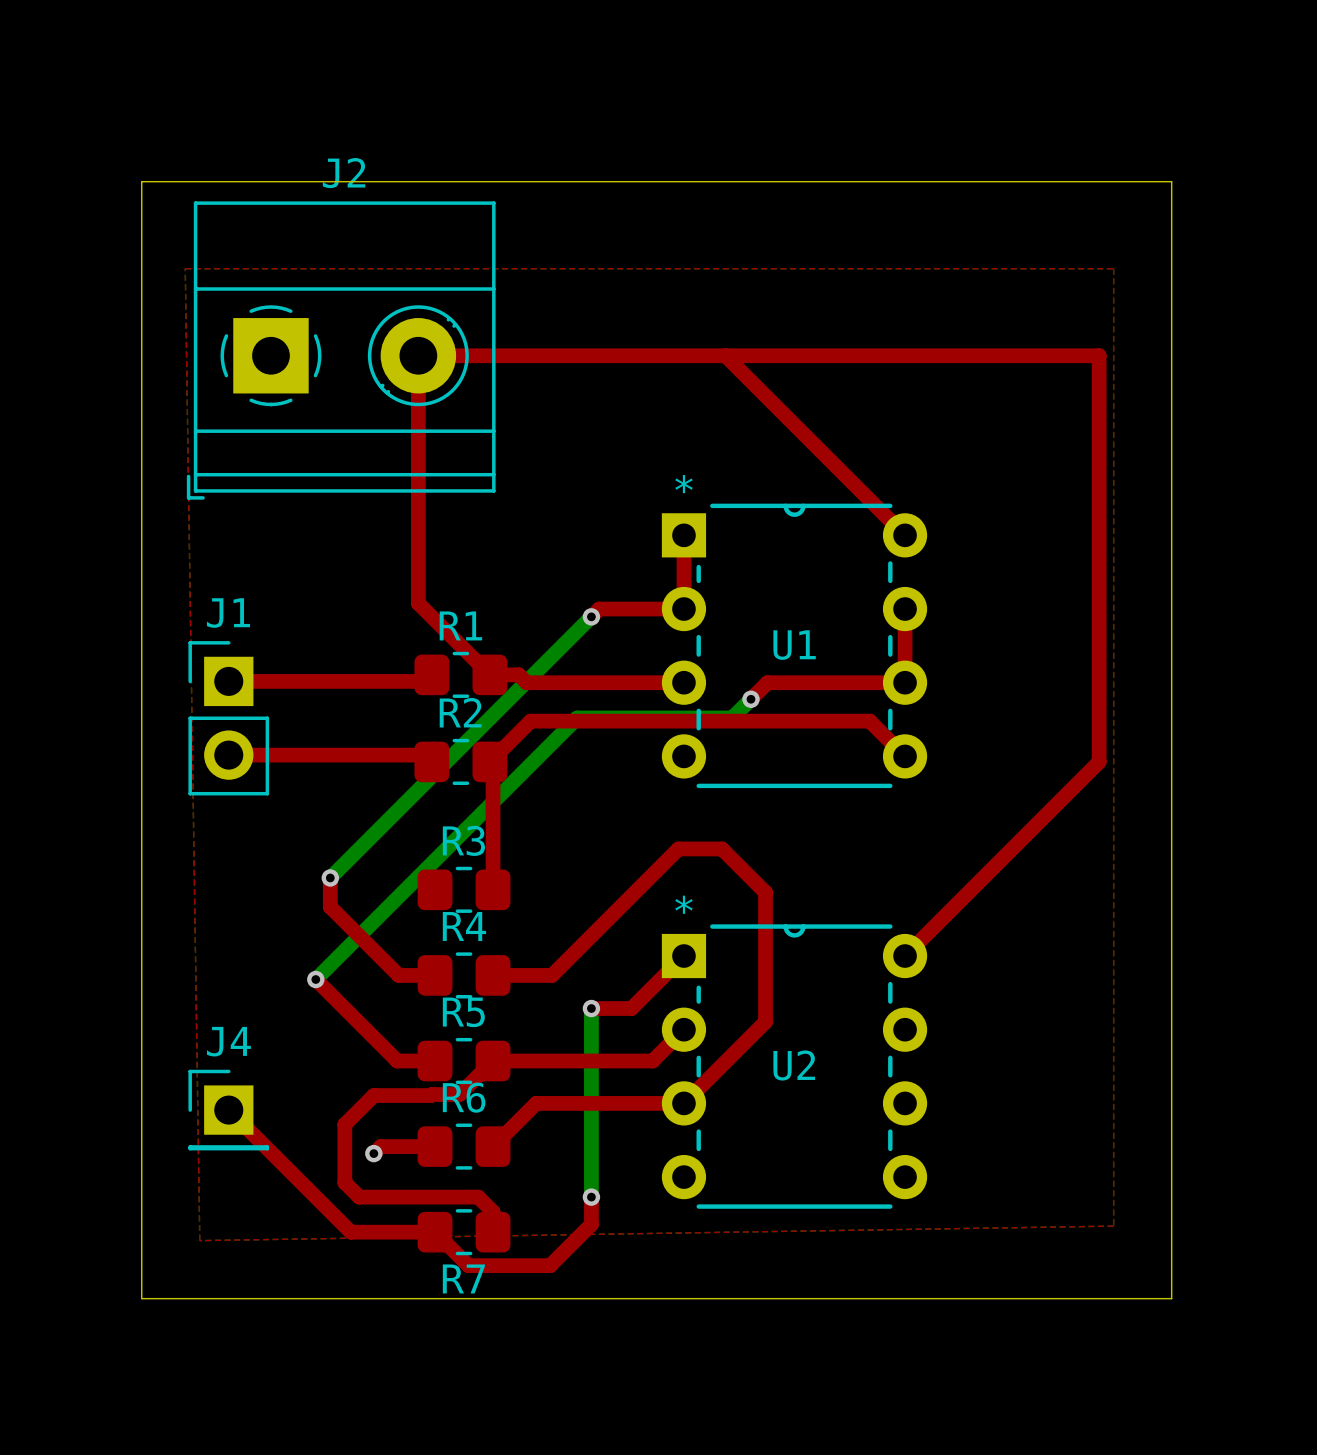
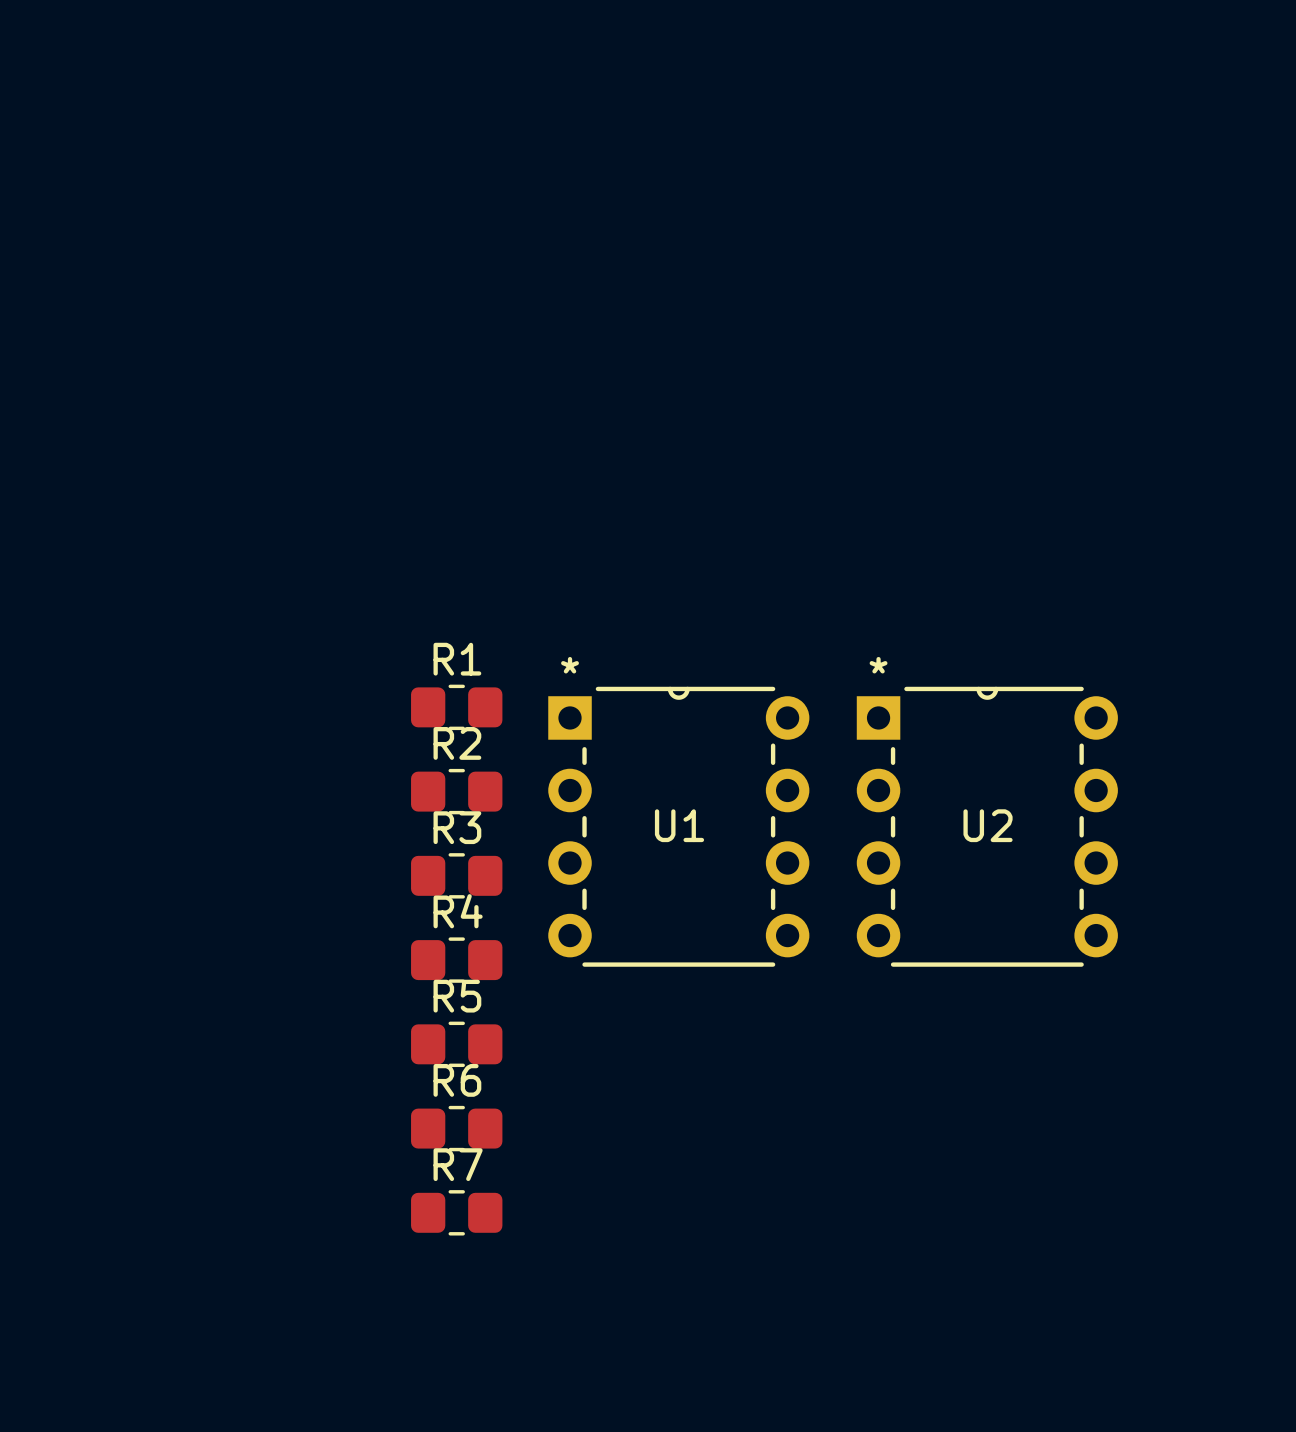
board edge: (141, 181) (1171, 181) (1171, 1298) (141, 1298) (141, 181) -> none
top zone outline: (185, 268) (1113, 268) (1113, 1226) (199, 1240) (185, 268) -> none
J2: (341, 350) -> none
top track: (725, 355) (905, 535) -> none
top track: (683, 535) (683, 609) (599, 609) (591, 616) -> none
top track: (905, 609) (905, 682) (767, 682) (750, 699) -> none
bottom track: (591, 616) (330, 877) -> none
via: (591, 616) -> none
U1 position: (794, 645) -> (678, 826)
top track: (431, 674) (425, 681) (228, 681) -> none
R1 position: (460, 674) -> (456, 707)
top track: (683, 682) (526, 682) (518, 674) (489, 674) (418, 603) (418, 355) (1099, 355) (1099, 761) (905, 956) -> none
bottom track: (750, 699) (732, 718) (577, 718) (315, 979) -> none
via: (750, 699) -> none
J1: (228, 718) -> none
top track: (228, 755) (425, 755) (431, 761) -> none
top track: (905, 756) (869, 721) (530, 721) (489, 761) (493, 765) (493, 889) -> none
R2 position: (460, 761) -> (456, 791)
top track: (330, 877) (330, 906) (398, 975) (435, 975) -> none
via: (330, 877) -> none
top track: (683, 956) (631, 1008) (591, 1008) -> none
top track: (493, 975) (552, 975) (678, 848) (721, 848) (765, 892) (765, 1021) (683, 1103) (536, 1103) (493, 1146) -> none
top track: (315, 979) (397, 1061) (435, 1061) -> none
via: (315, 979) -> none
bottom track: (591, 1008) (591, 1197) -> none
via: (591, 1008) -> none
top track: (683, 1029) (652, 1061) (493, 1061) (459, 1094) (373, 1095) (344, 1124) (344, 1182) (359, 1197) (478, 1197) (493, 1211) (493, 1232) -> none
U2 position: (794, 1066) -> (987, 826)
top track: (228, 1110) (350, 1232) (435, 1232) (468, 1265) (550, 1265) (591, 1224) (591, 1197) -> none
J4: (228, 1110) -> none
top track: (435, 1146) (380, 1146) (373, 1153) -> none
via: (373, 1153) -> none
via: (591, 1197) -> none
R7 name position: R7 (463, 1278) -> R7 (458, 1164)

